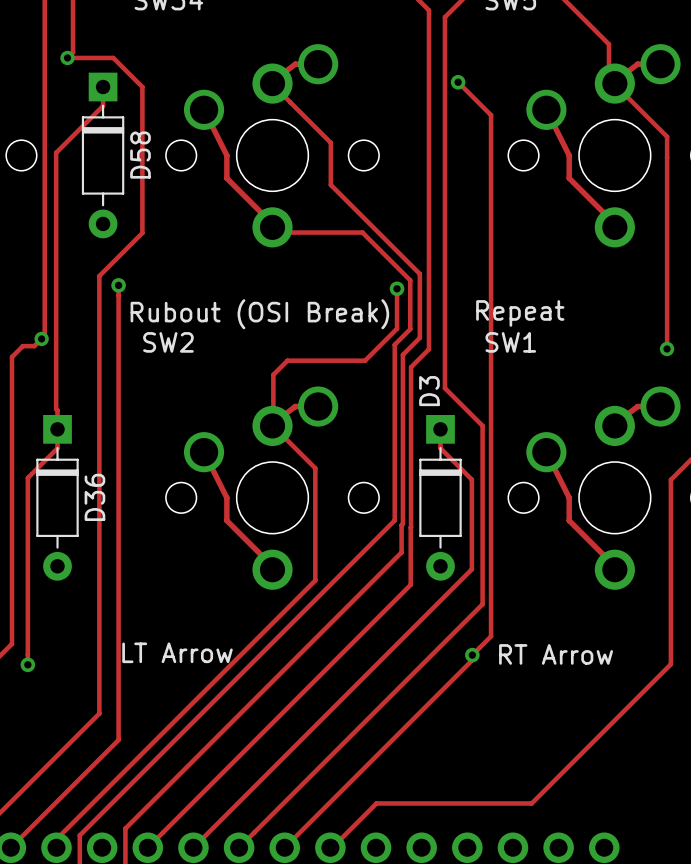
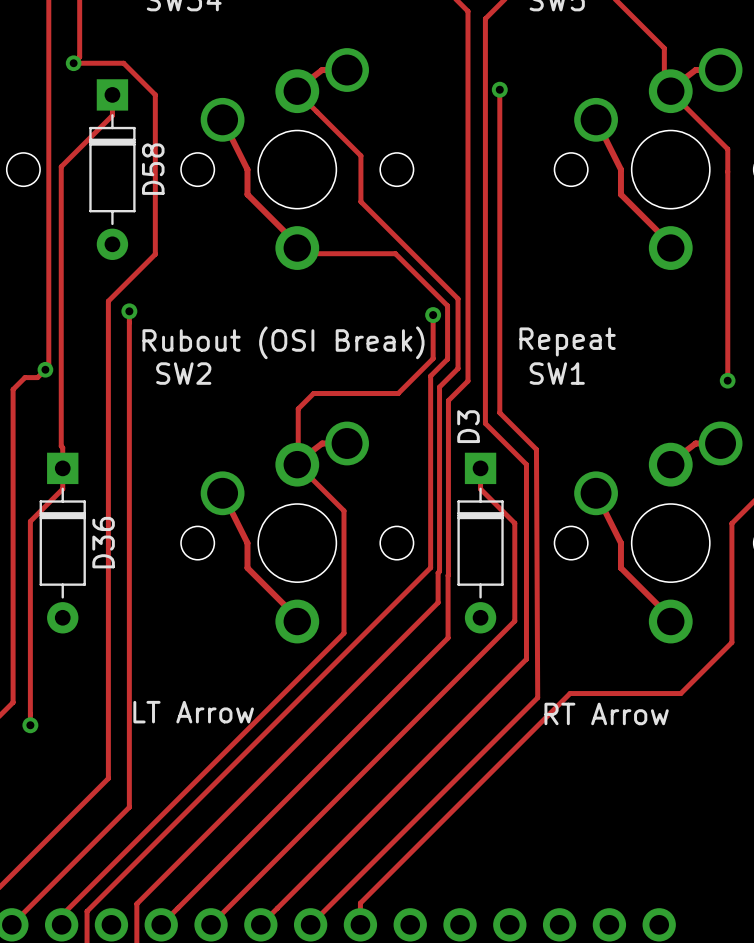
track: (458, 82) (491, 115) (491, 636) (472, 655) (472, 660) -> (499, 89) (499, 412) (536, 449) (537, 697) (515, 720)
track: (670, 588) (670, 664) (531, 803) (376, 803) (330, 847) -> (731, 642) (680, 693) (570, 693) (360, 903) (360, 924)
via: (472, 655) -> none

